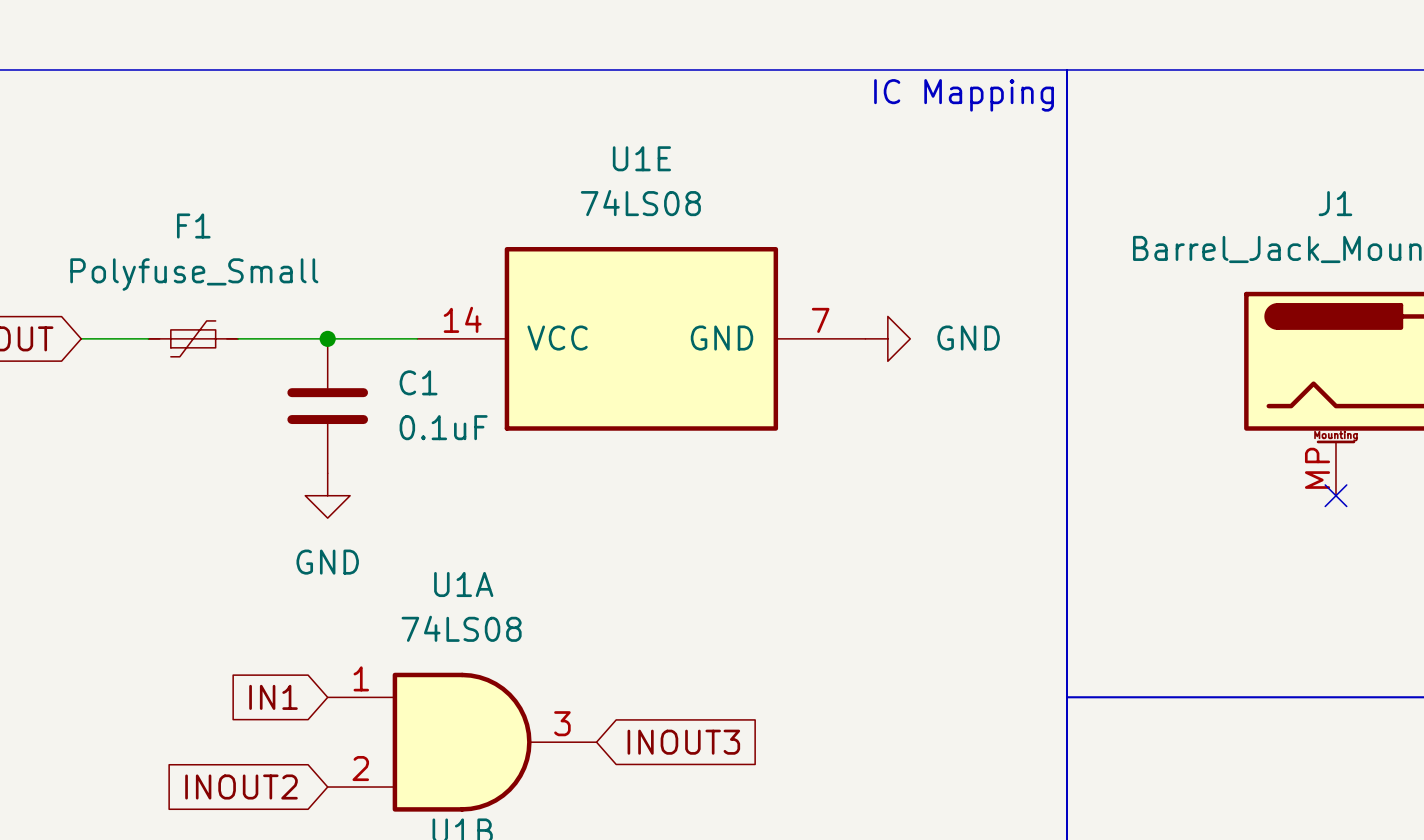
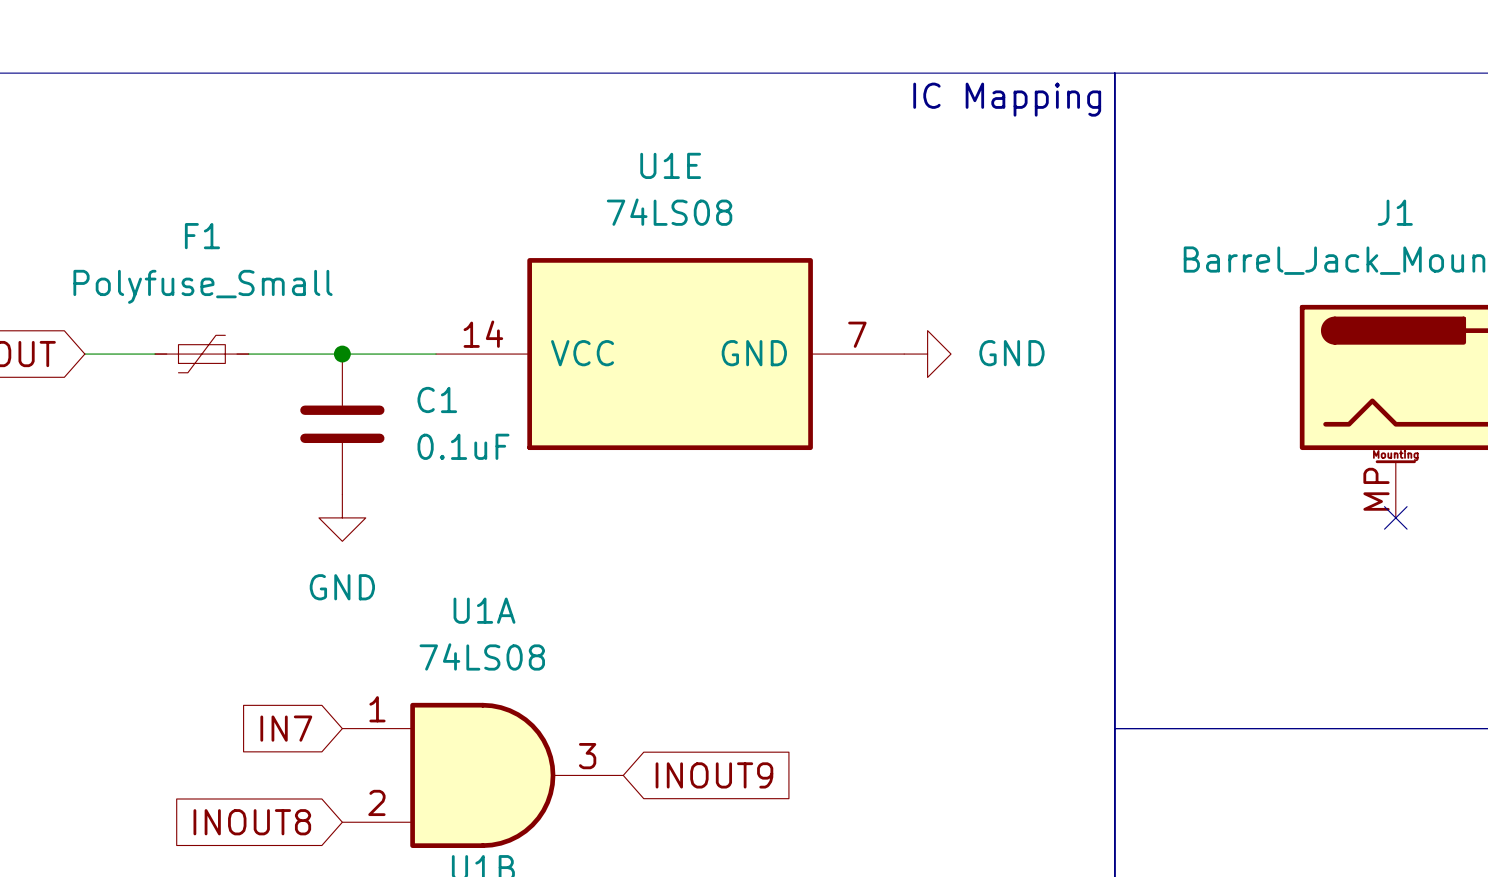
global label: IN1 (273, 697) -> IN7 (286, 728)
global label: INOUT3 (683, 742) -> INOUT9 (714, 775)
global label: INOUT2 (241, 787) -> INOUT8 (252, 822)

